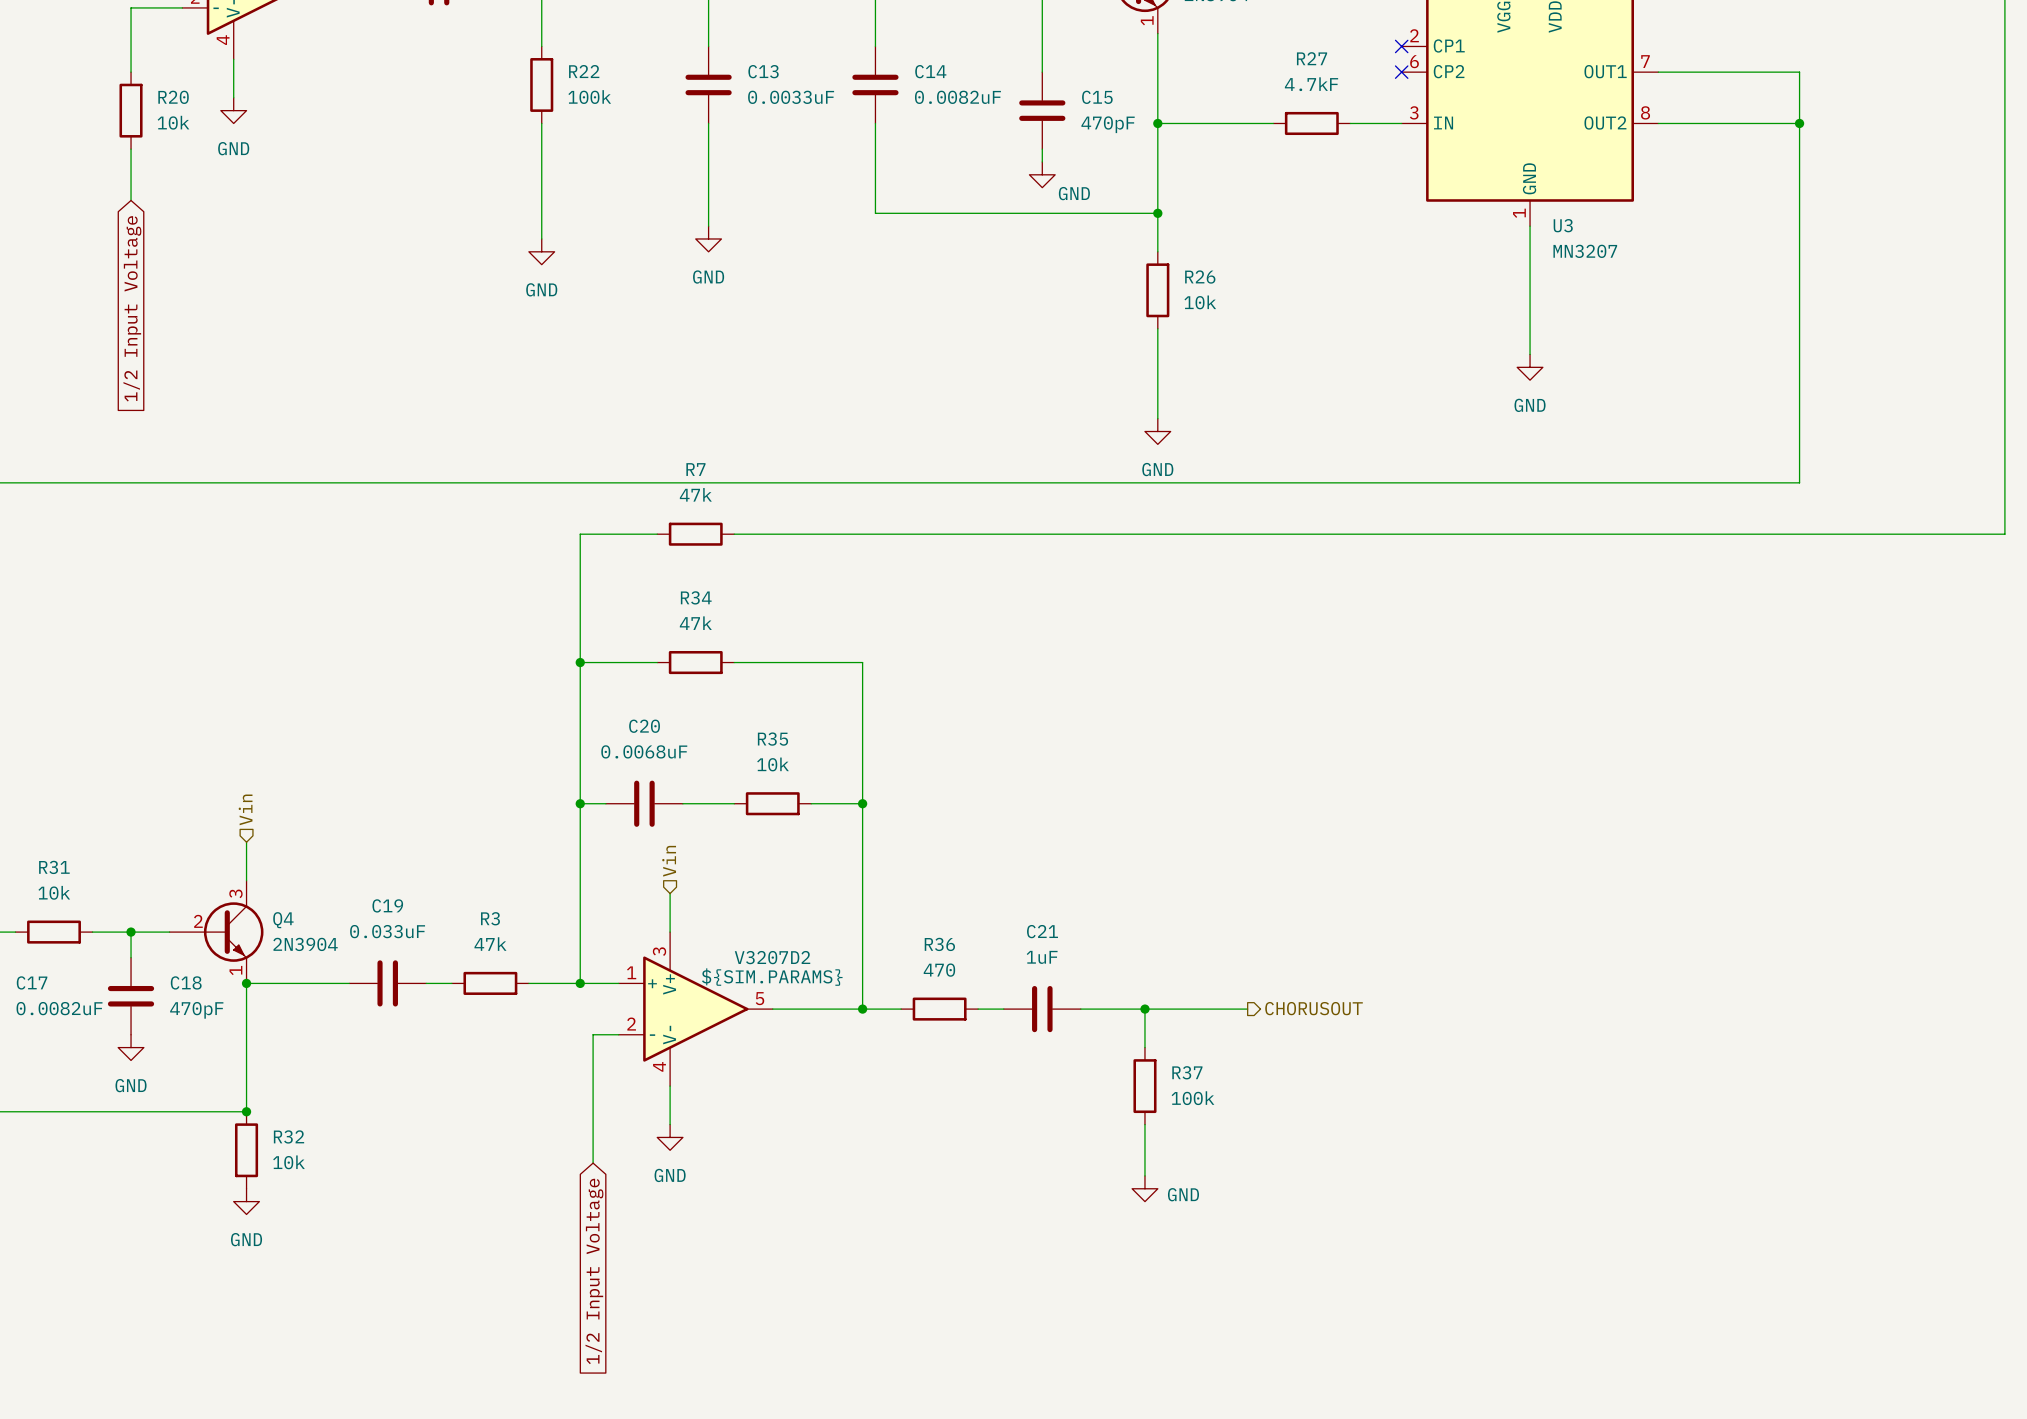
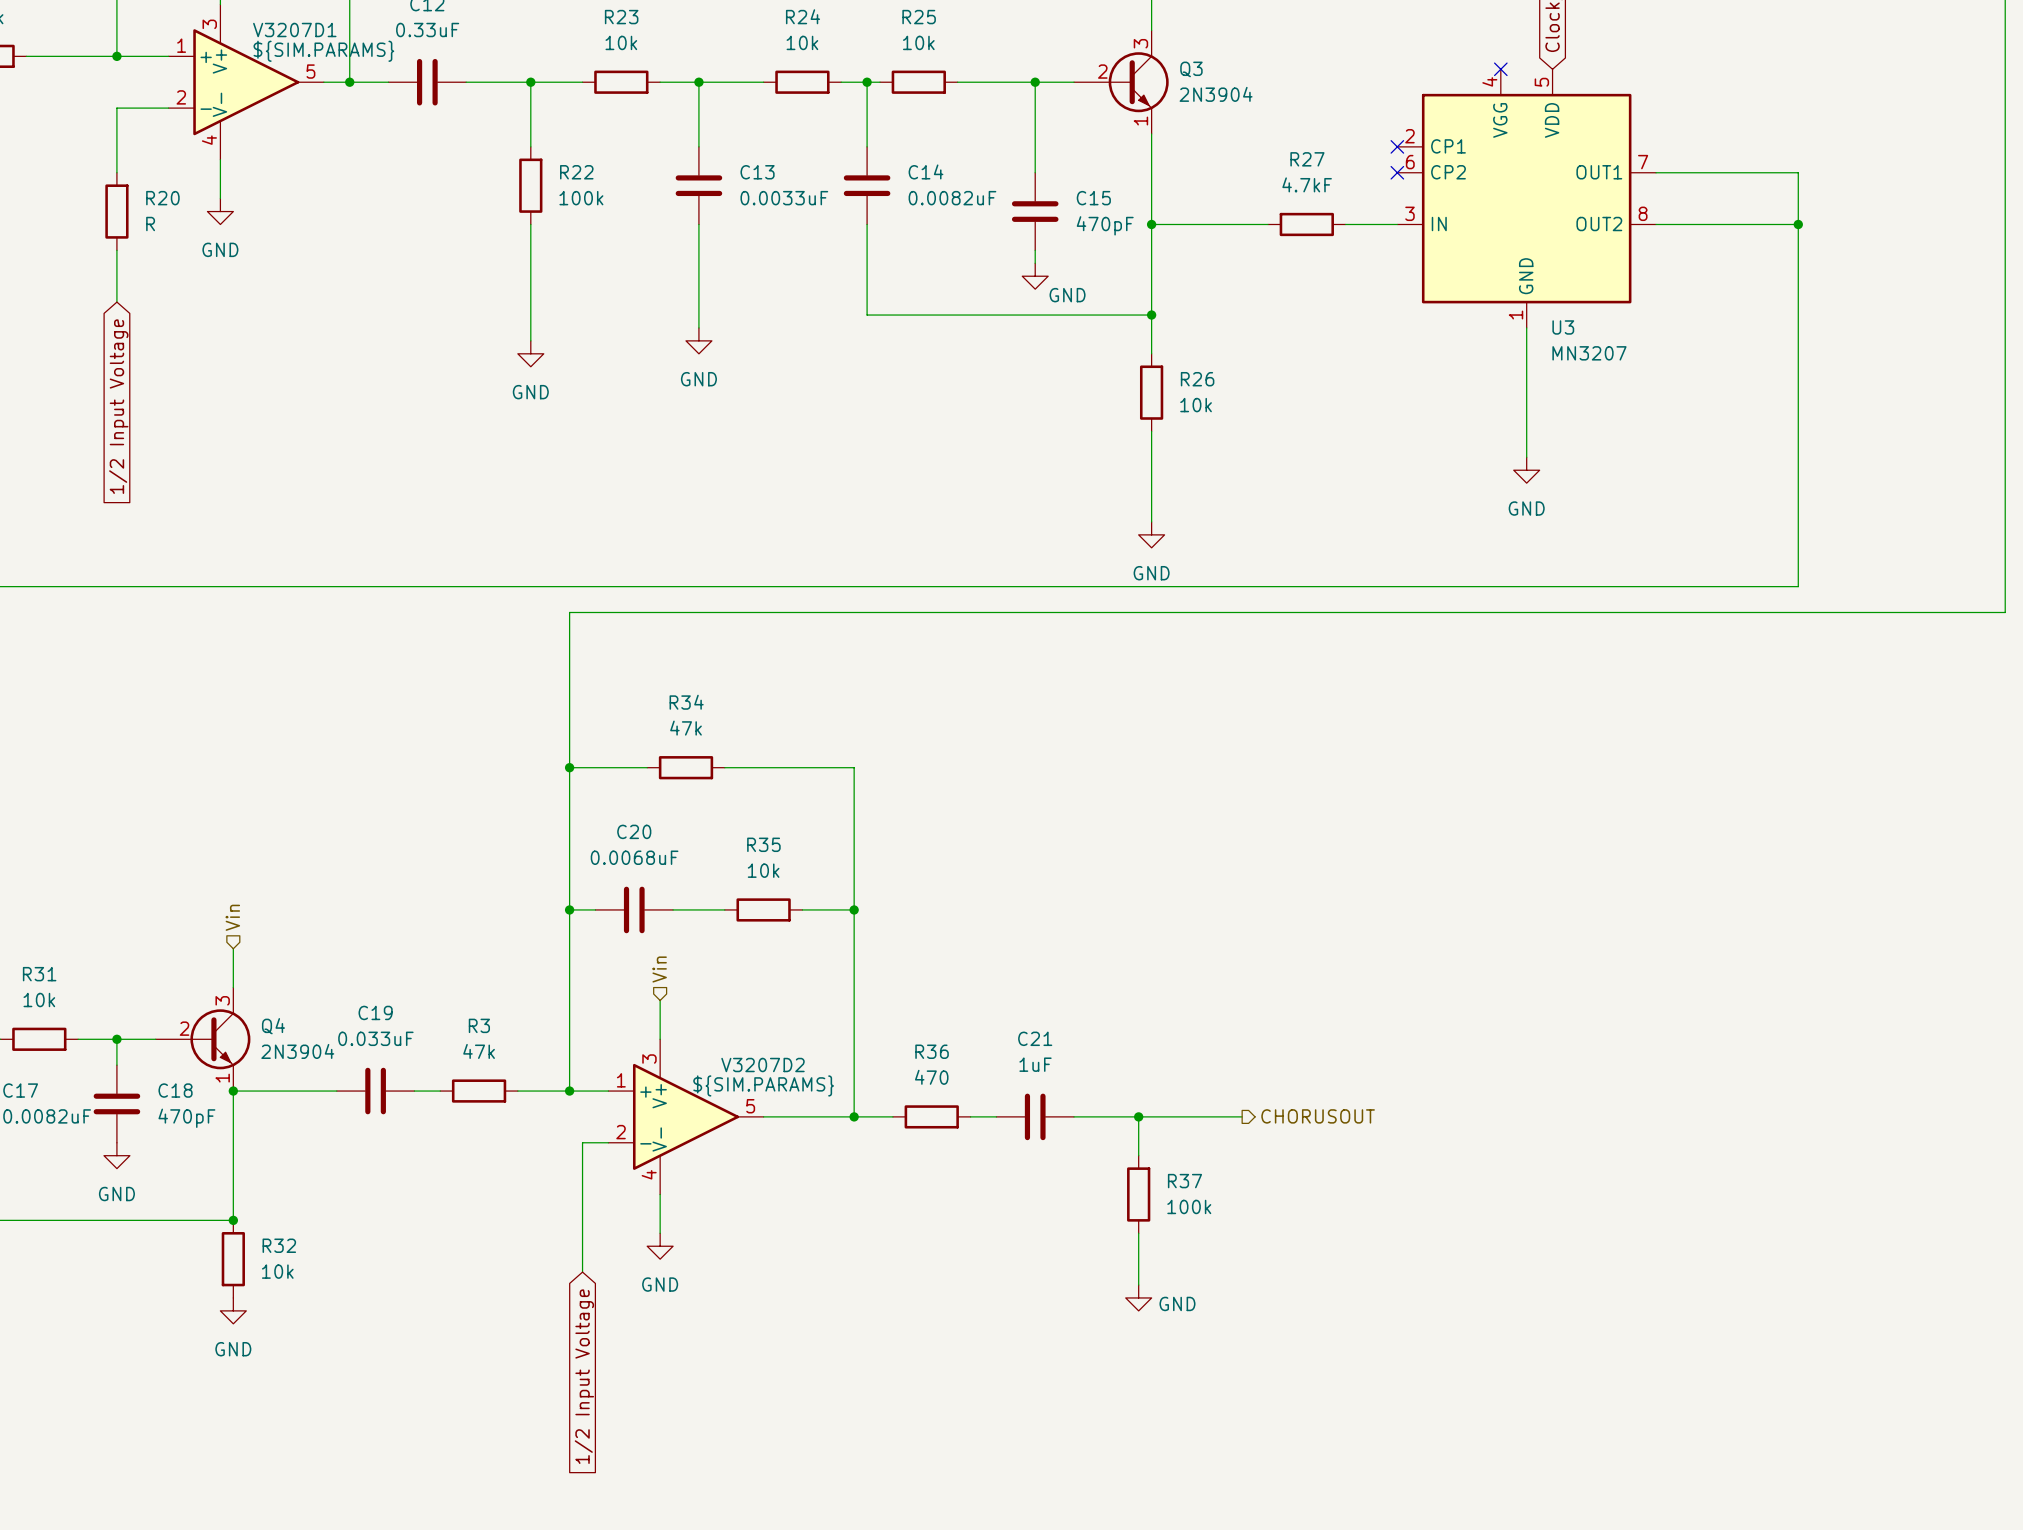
R20 value: 10k (173, 122) -> R (150, 224)
wire: (2004, 508) (2004, 534) (734, 534) -> (2005, 612) (569, 612) (569, 638)
wire: (580, 534) (657, 534) -> none
R7: 47k (695, 534) -> none

